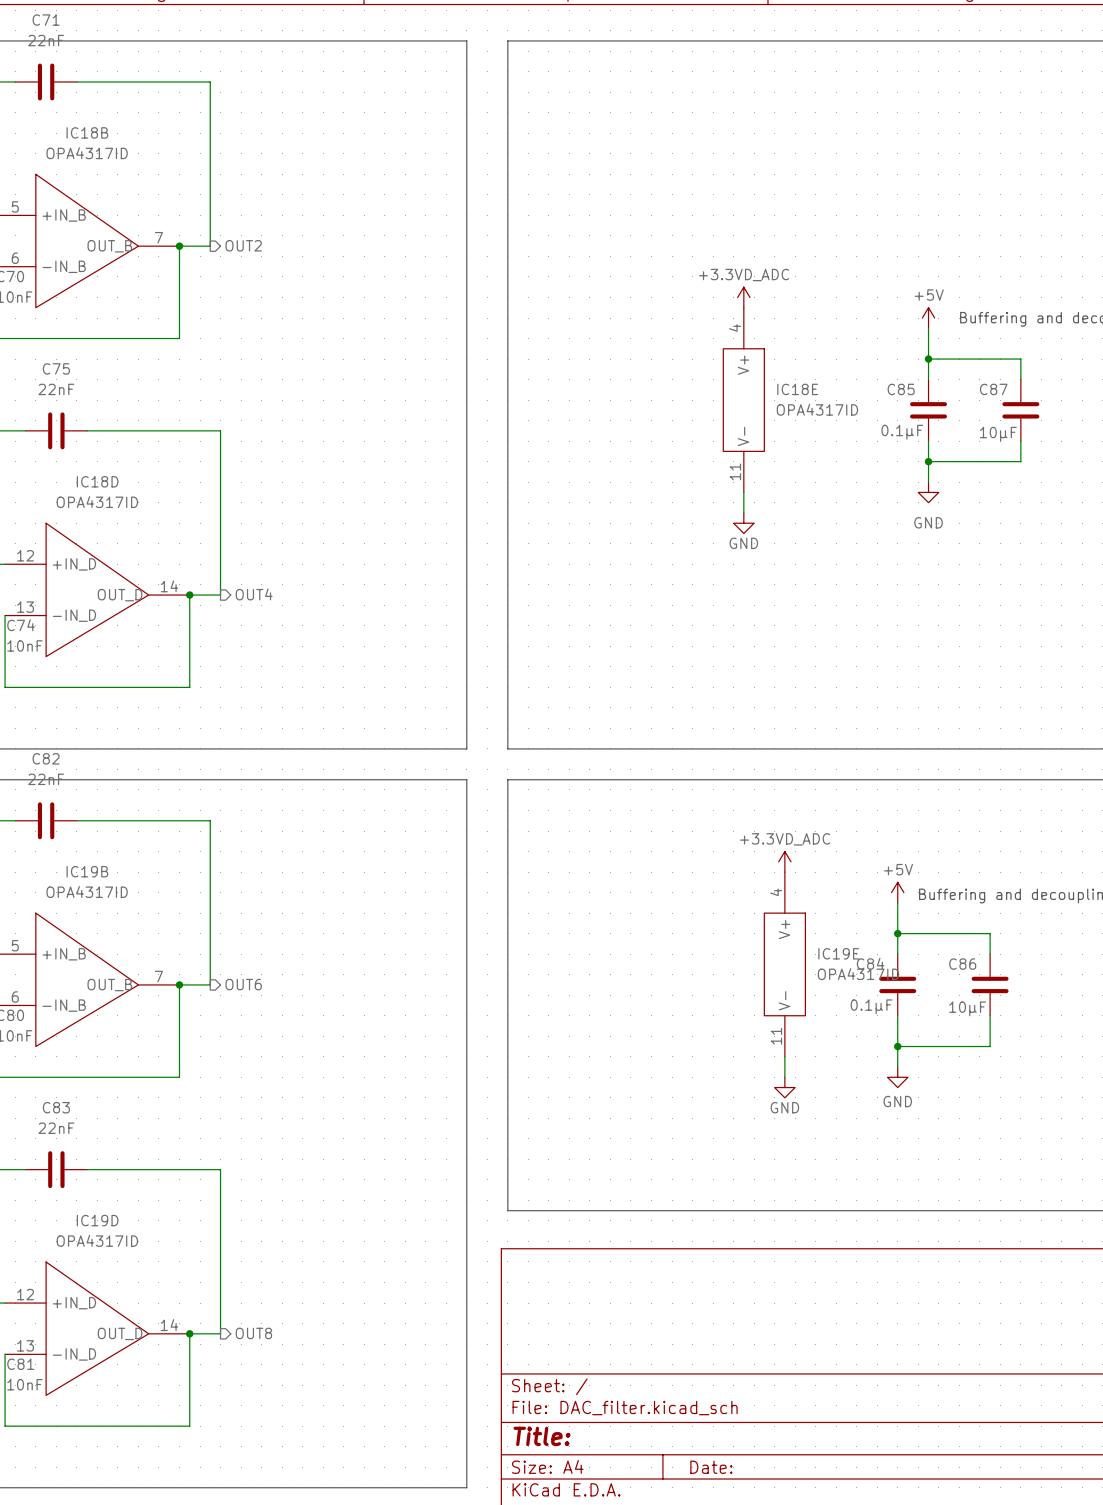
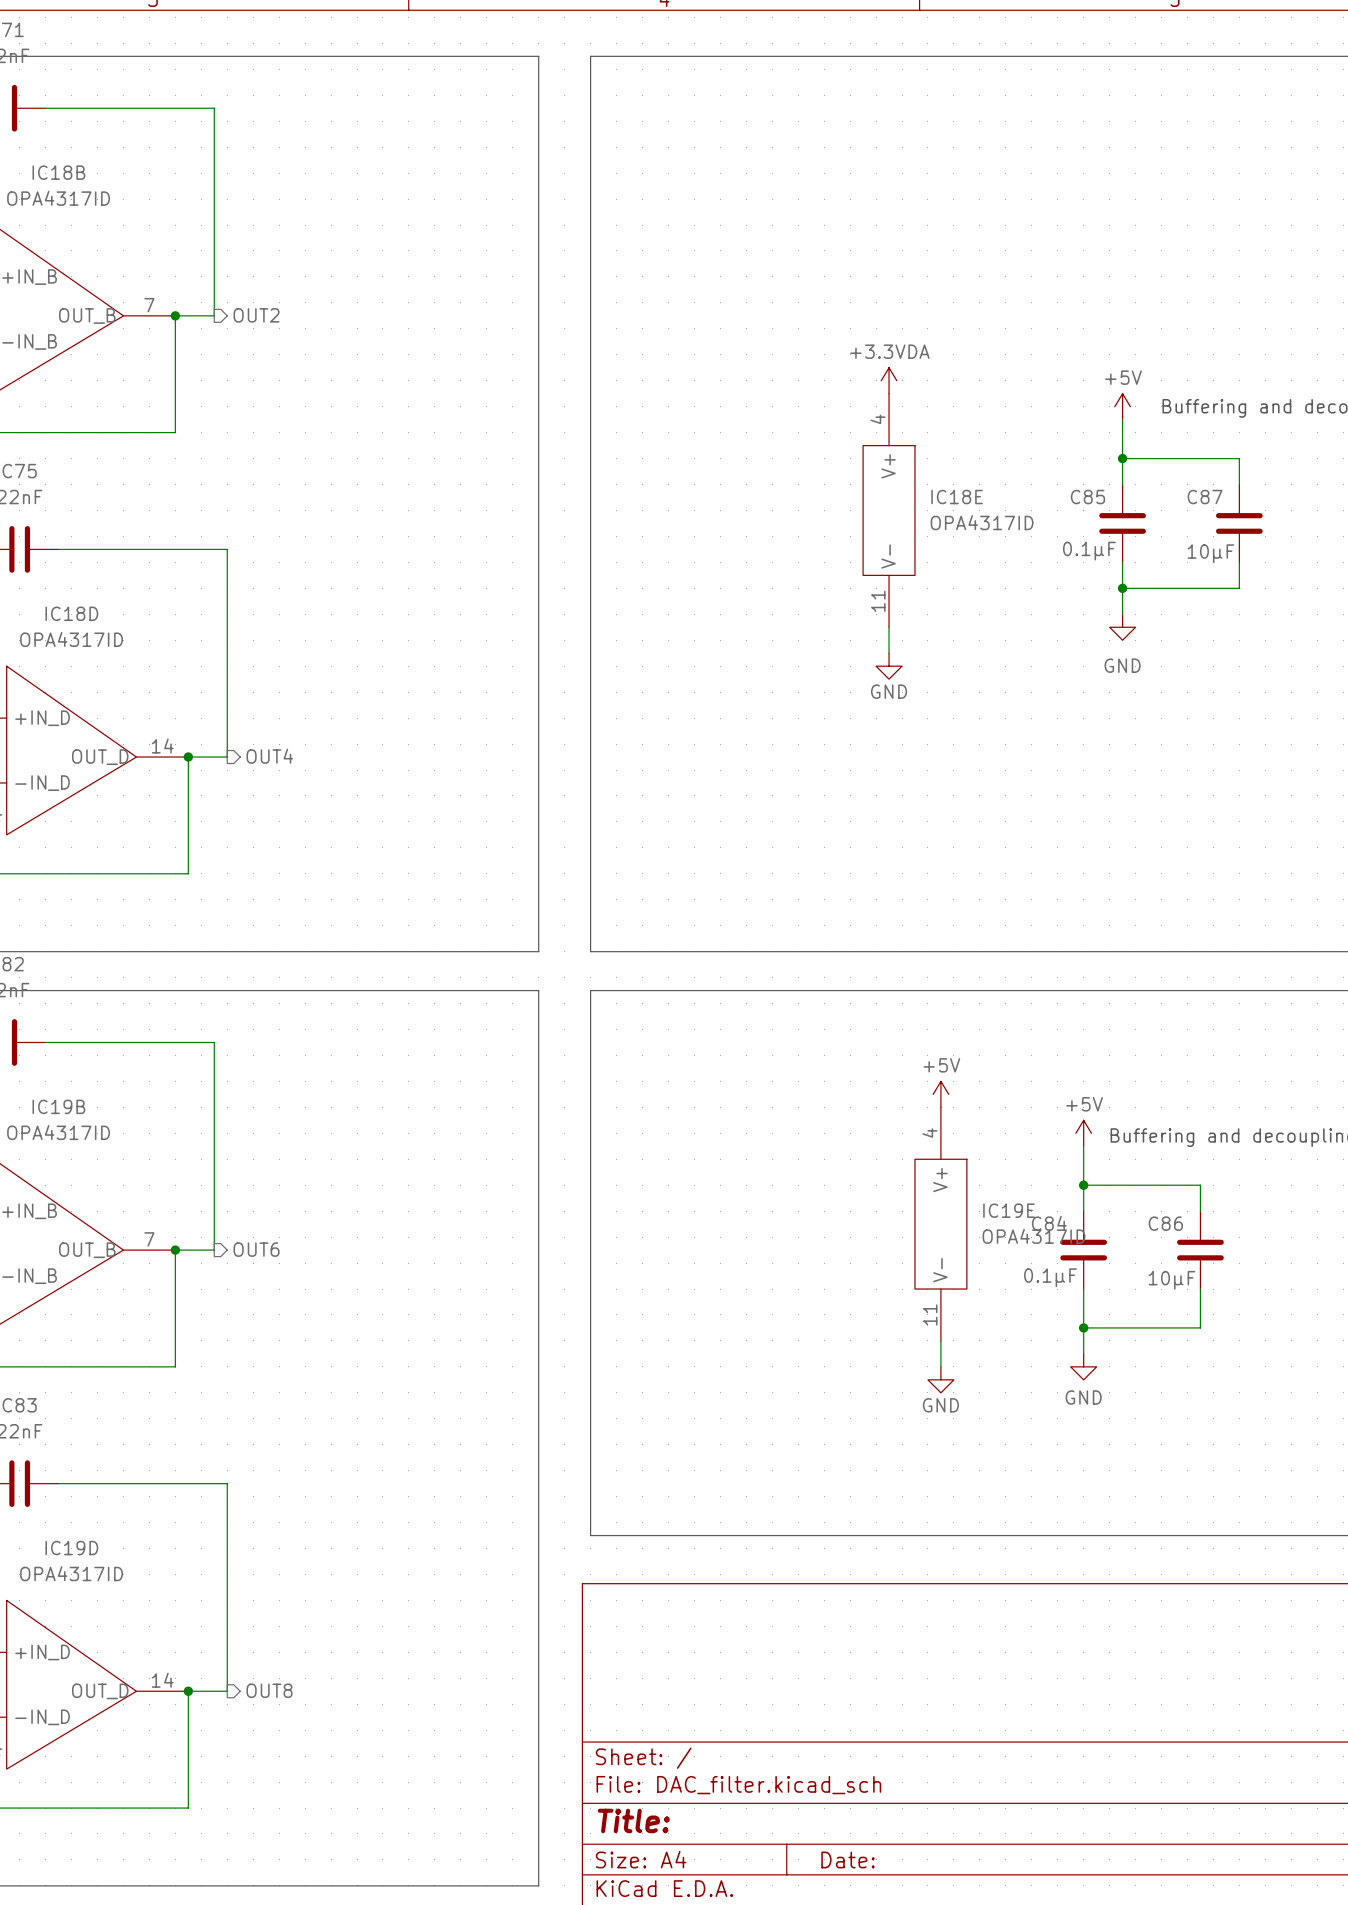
power symbol: +3.3VD_ADC (743, 297) -> +3.3VDA (889, 380)
power symbol: +3.3VD_ADC (784, 861) -> +5V (940, 1094)

